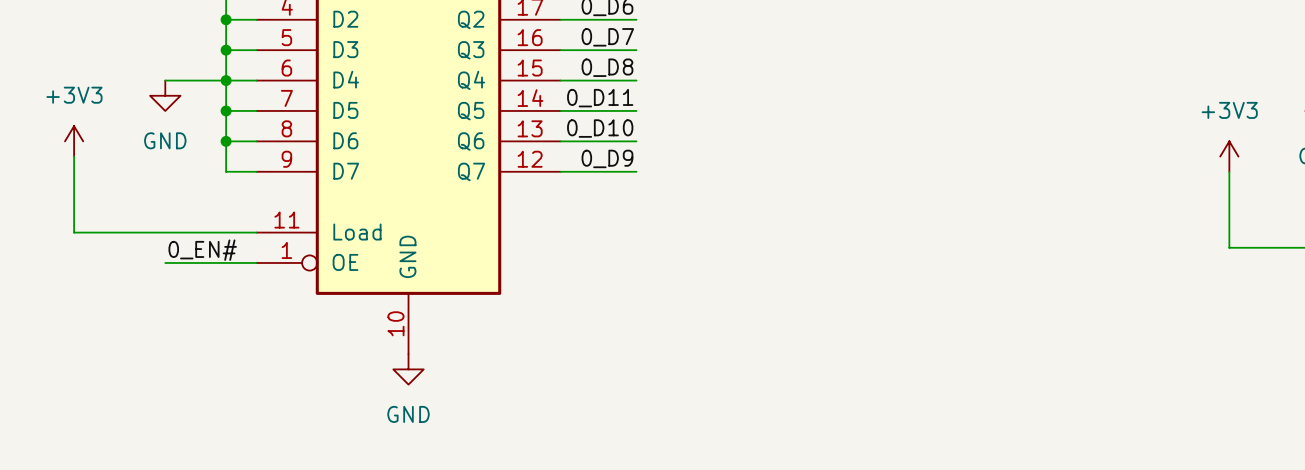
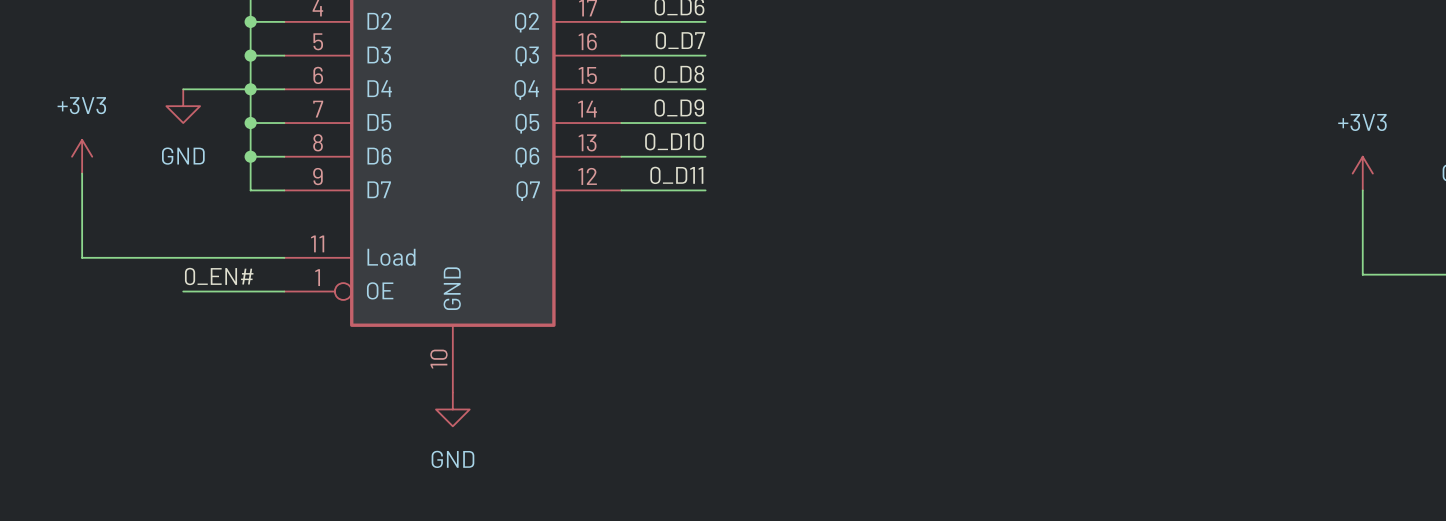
label: 0_D11 (600, 98) -> 0_D9 (679, 107)
label: 0_D9 (607, 158) -> 0_D11 (676, 175)

